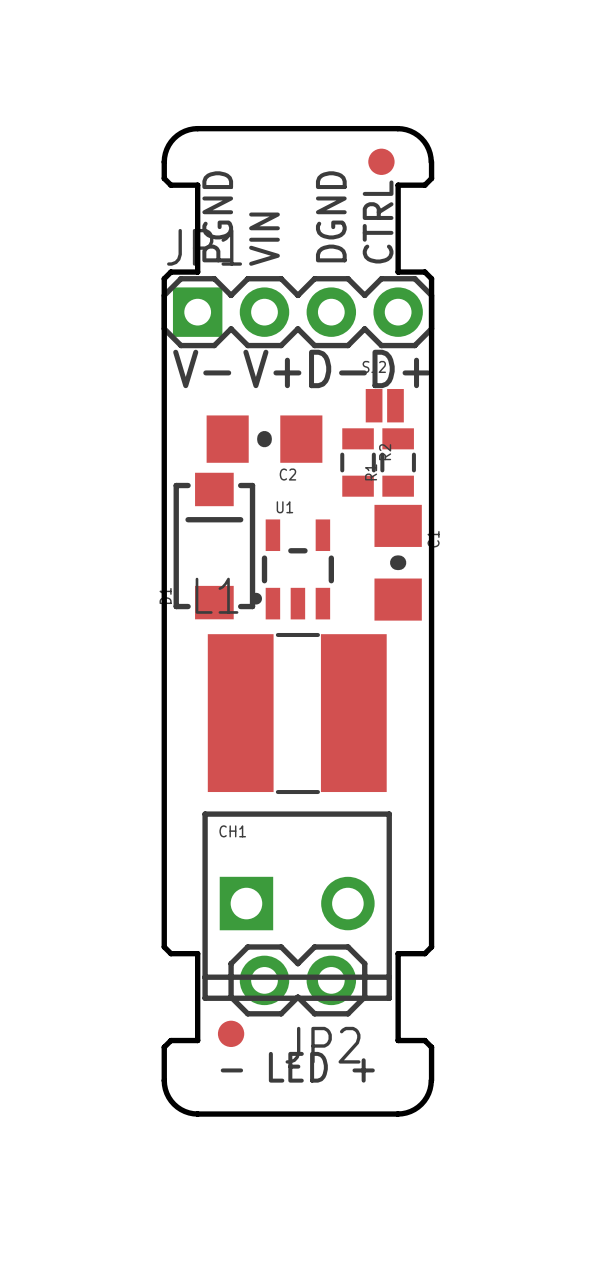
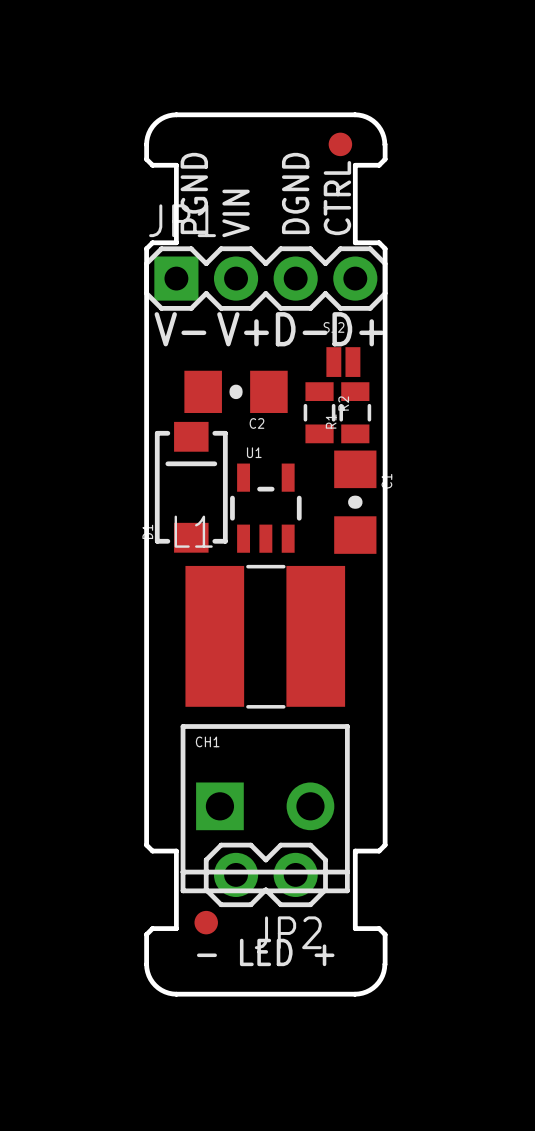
U1 footprint: [250, 519, 334, 620] -> [230, 463, 302, 553]

